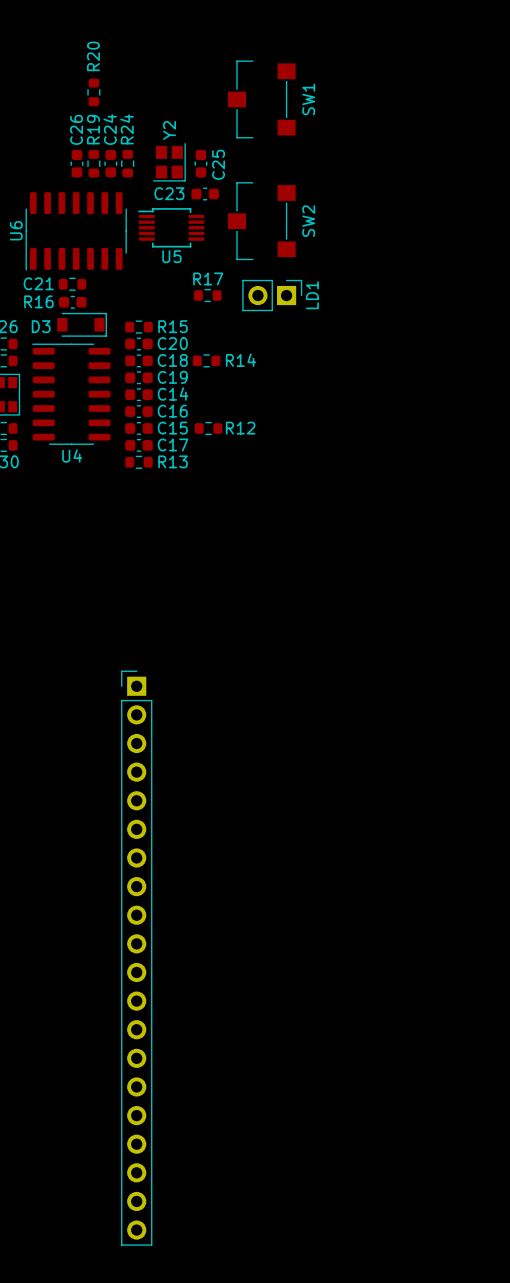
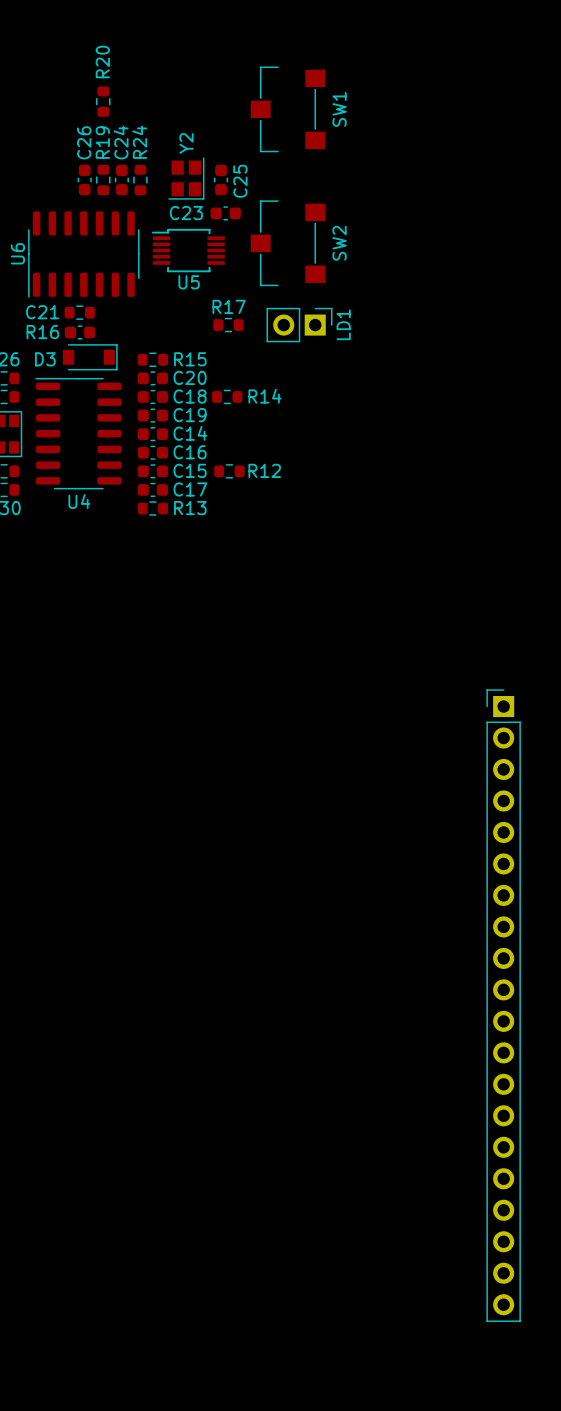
part: none -> (503, 1005)
part: (136, 958) -> none

